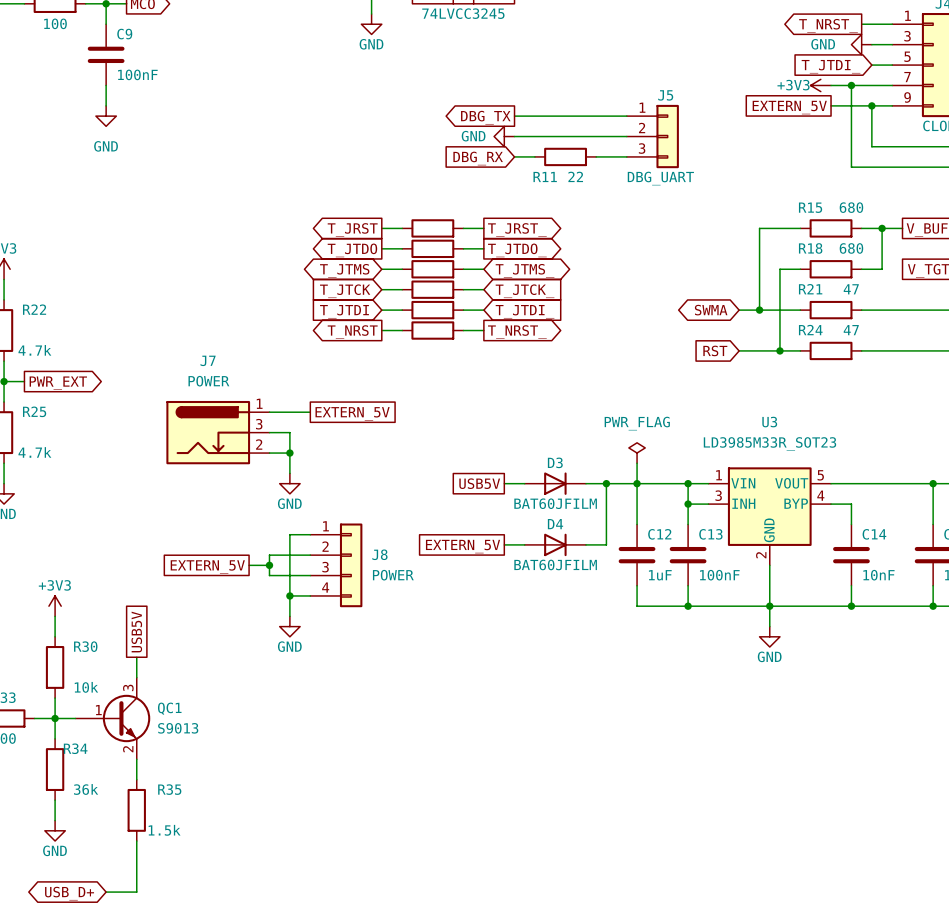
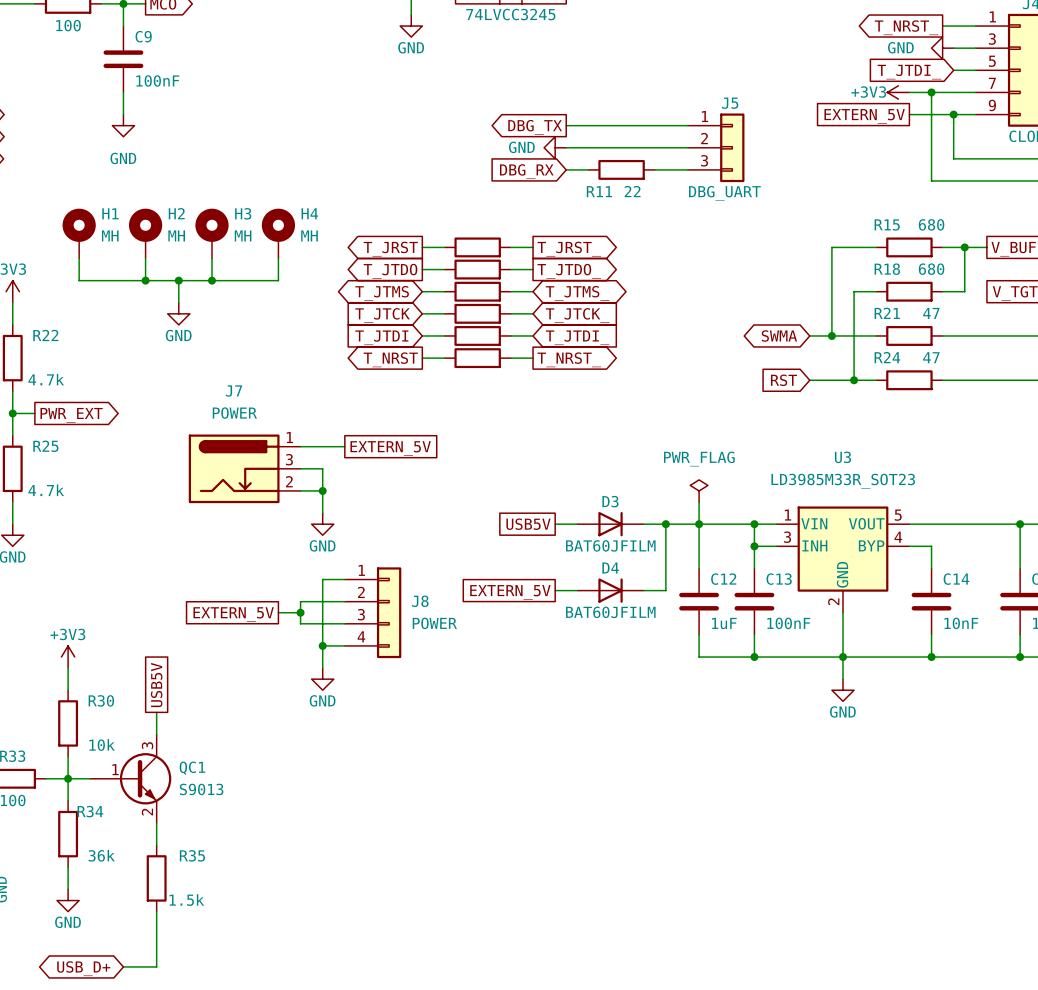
H1: none -> MH (79, 233)
H2: none -> MH (145, 233)
H3: none -> MH (212, 233)
H4: none -> MH (278, 233)
wire: none -> (79, 258) (79, 280) (278, 280) (278, 258)
wire: none -> (145, 258) (145, 280)
wire: none -> (212, 258) (212, 280)
junction: none -> (145, 280)
wire: none -> (178, 280) (178, 302)
junction: none -> (178, 280)
junction: none -> (212, 280)
power symbol: none -> GND (178, 313)

